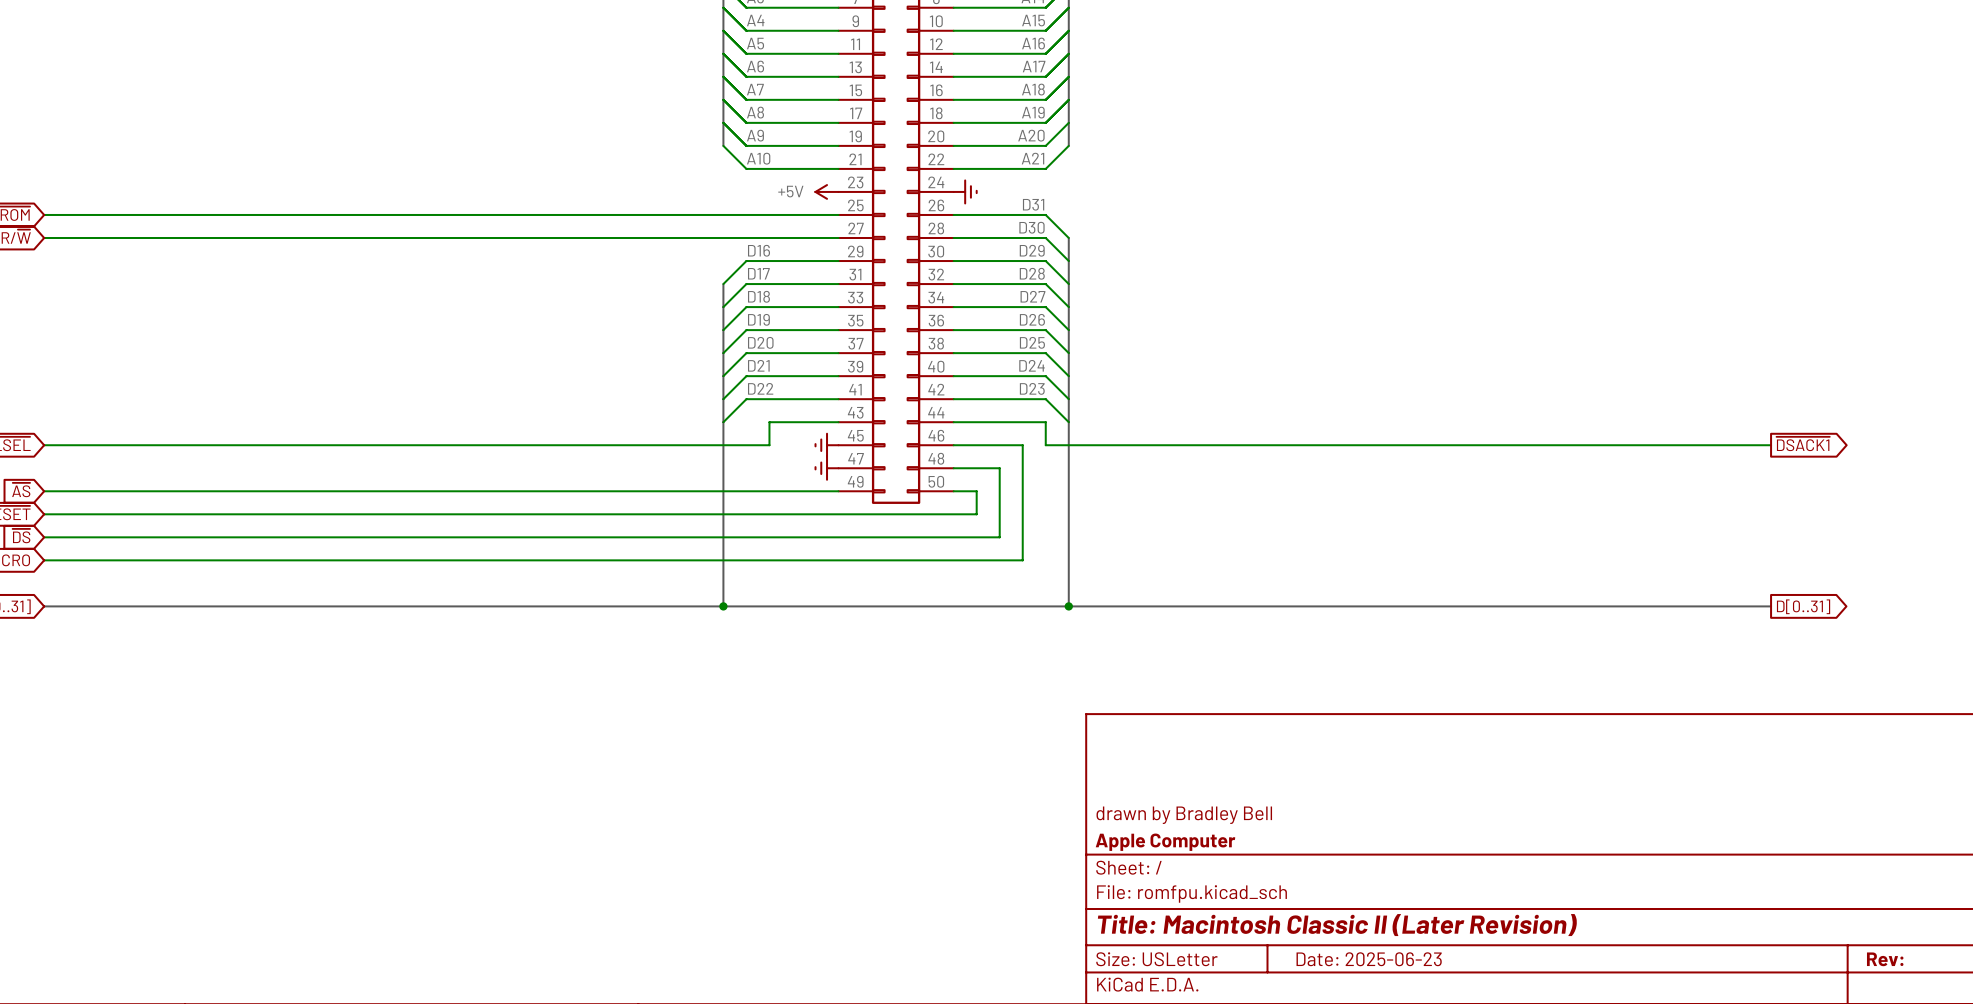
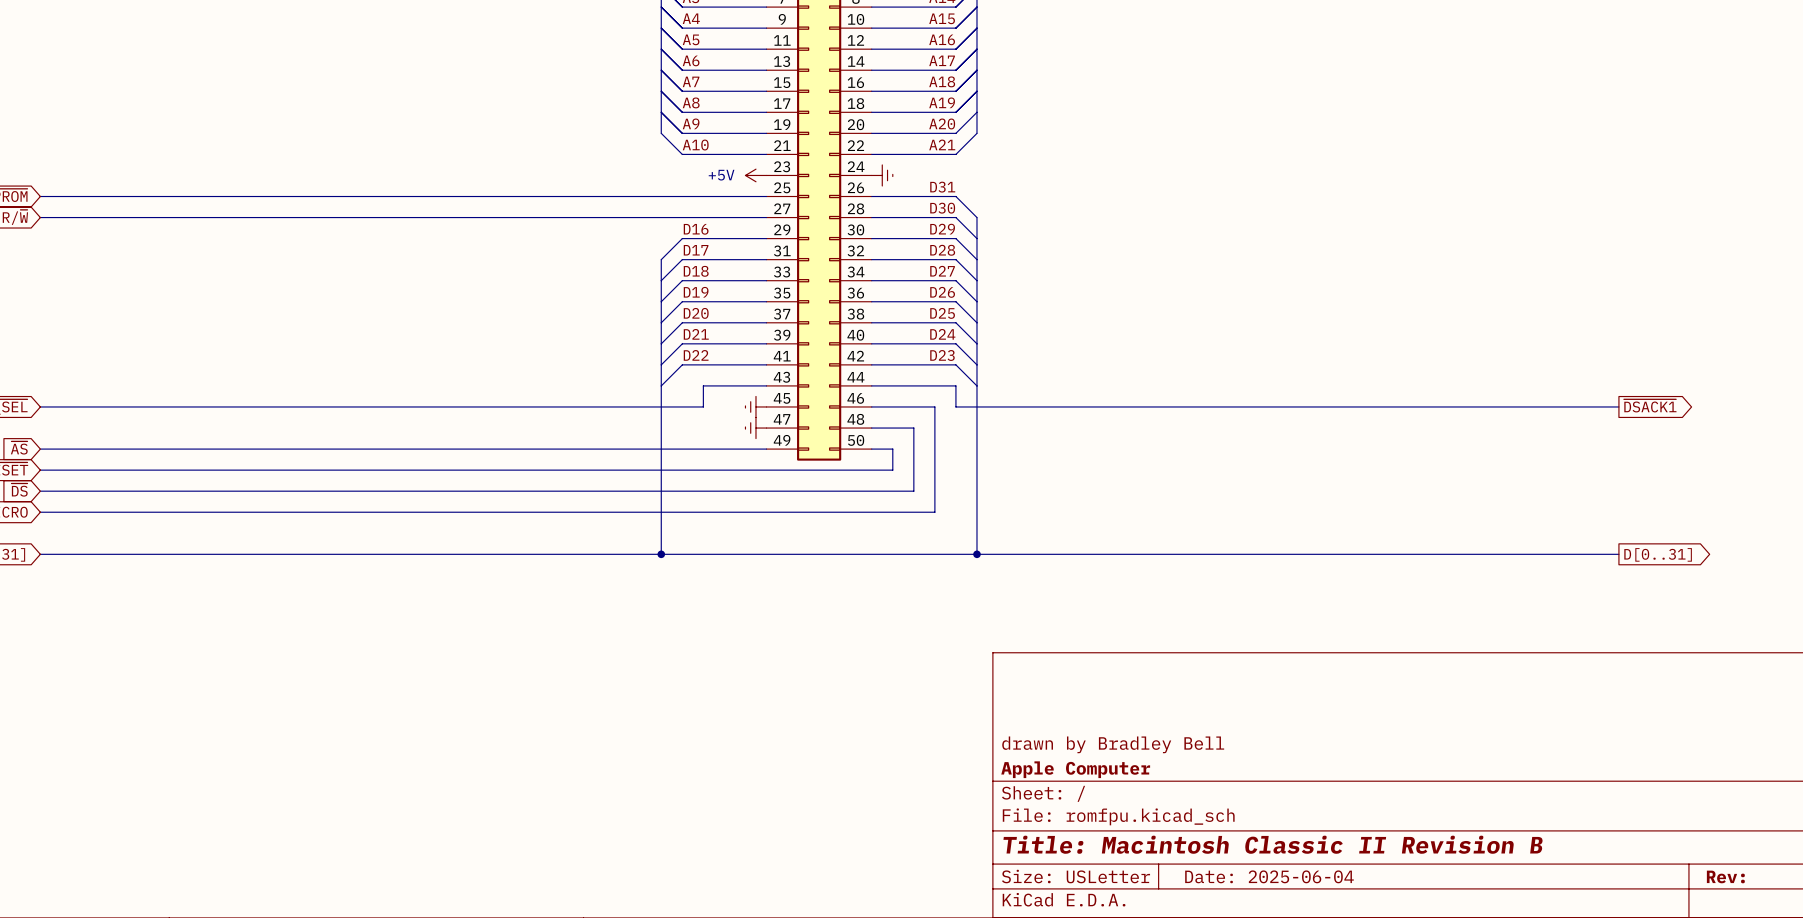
title block: Title: Macintosh Classic II (Later Revision) (1337, 925) -> Title: Macintosh Classic II Revision B (1273, 844)
title block: Date: 2025-06-23 (1369, 959) -> Date: 2025-06-04 (1269, 876)

